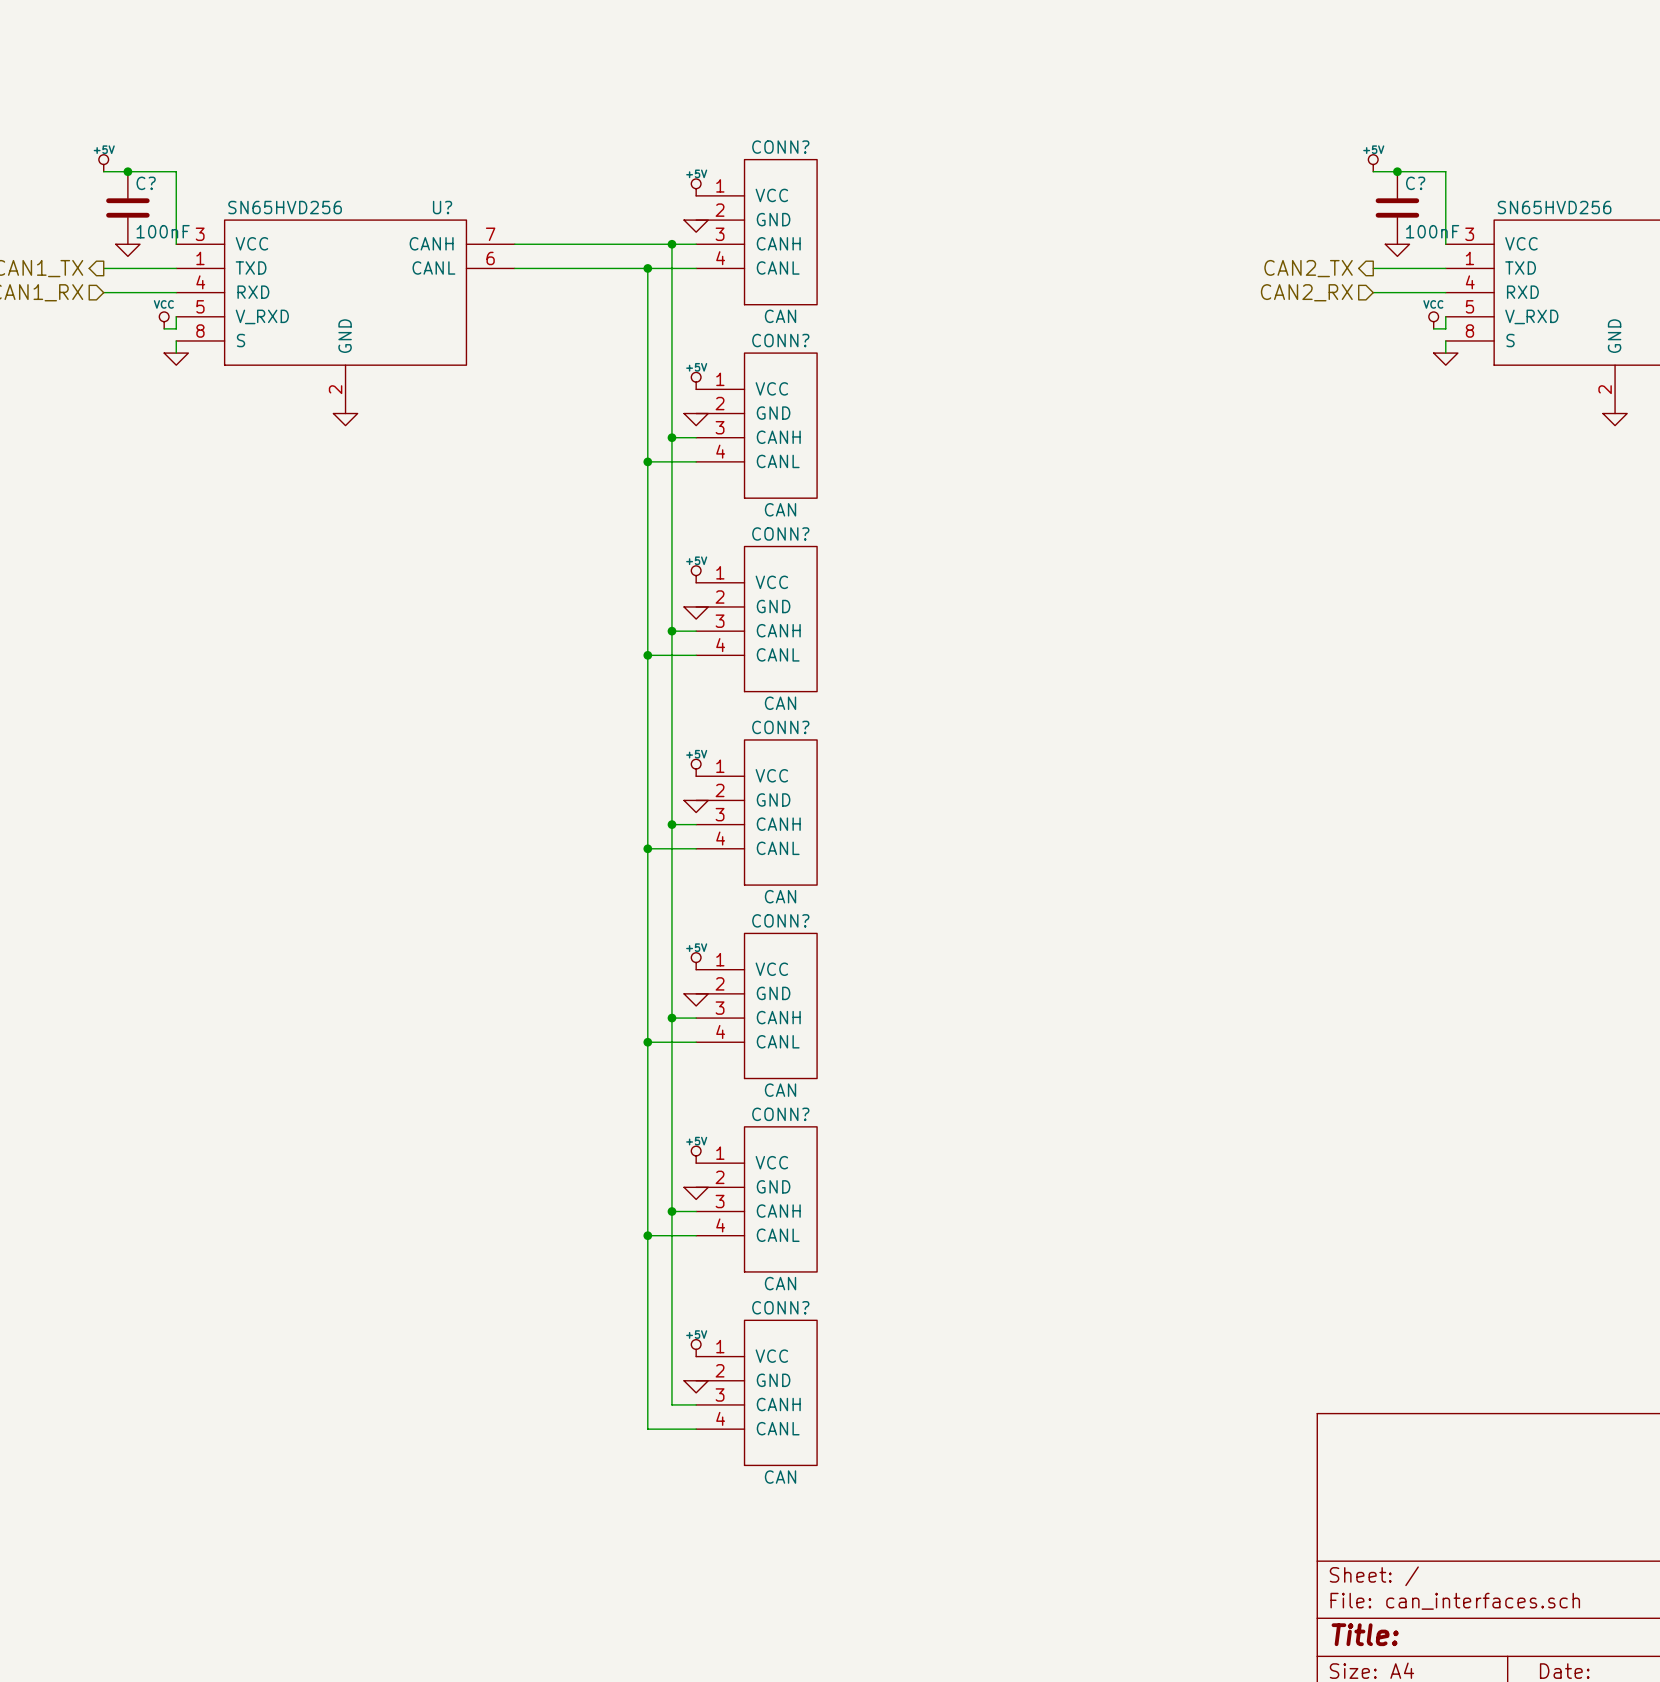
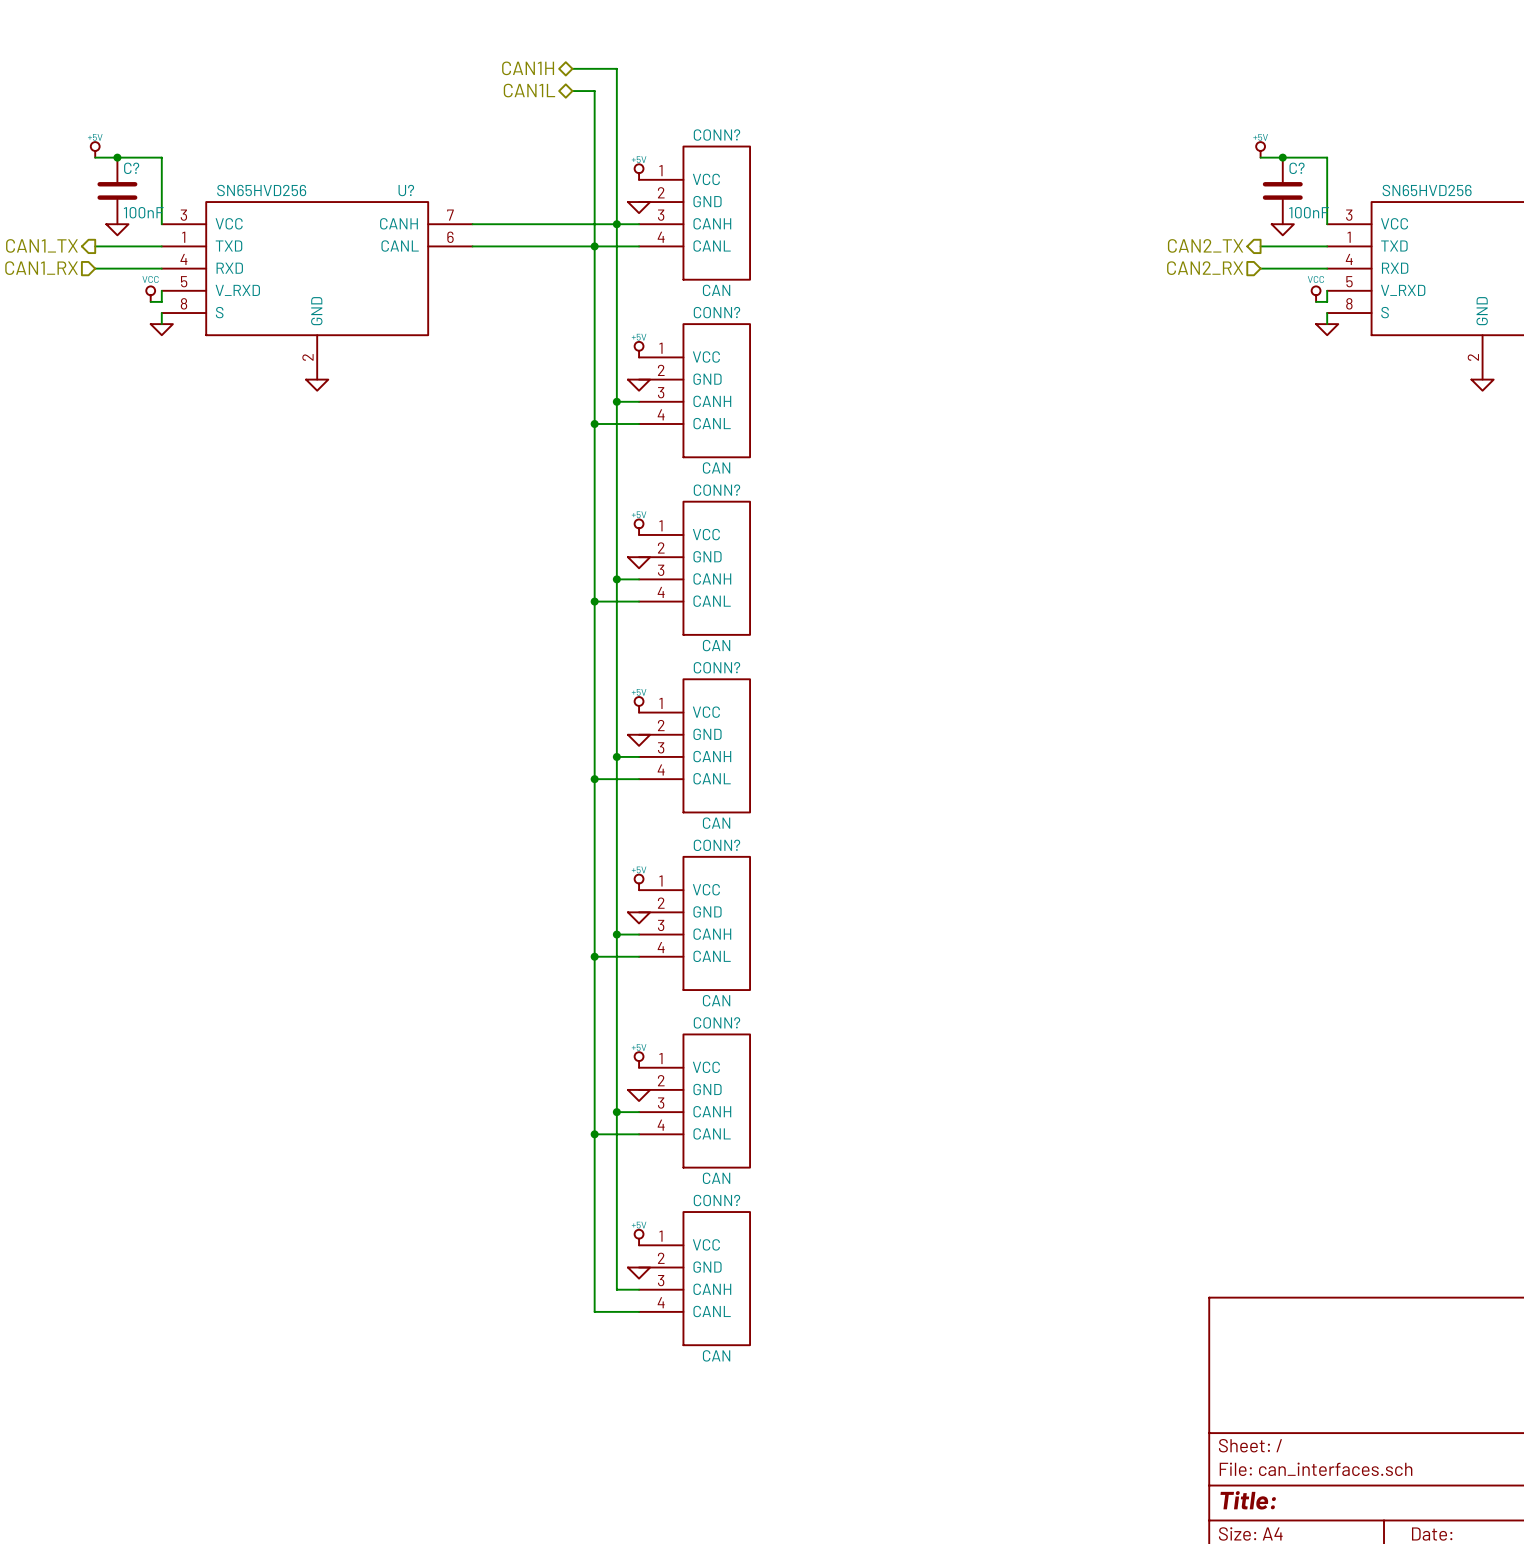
hierarchical label: none -> CAN1H (528, 68)
wire: none -> (572, 68) (616, 68) (616, 224)
hierarchical label: none -> CAN1L (529, 90)
wire: none -> (572, 91) (594, 91) (594, 246)

